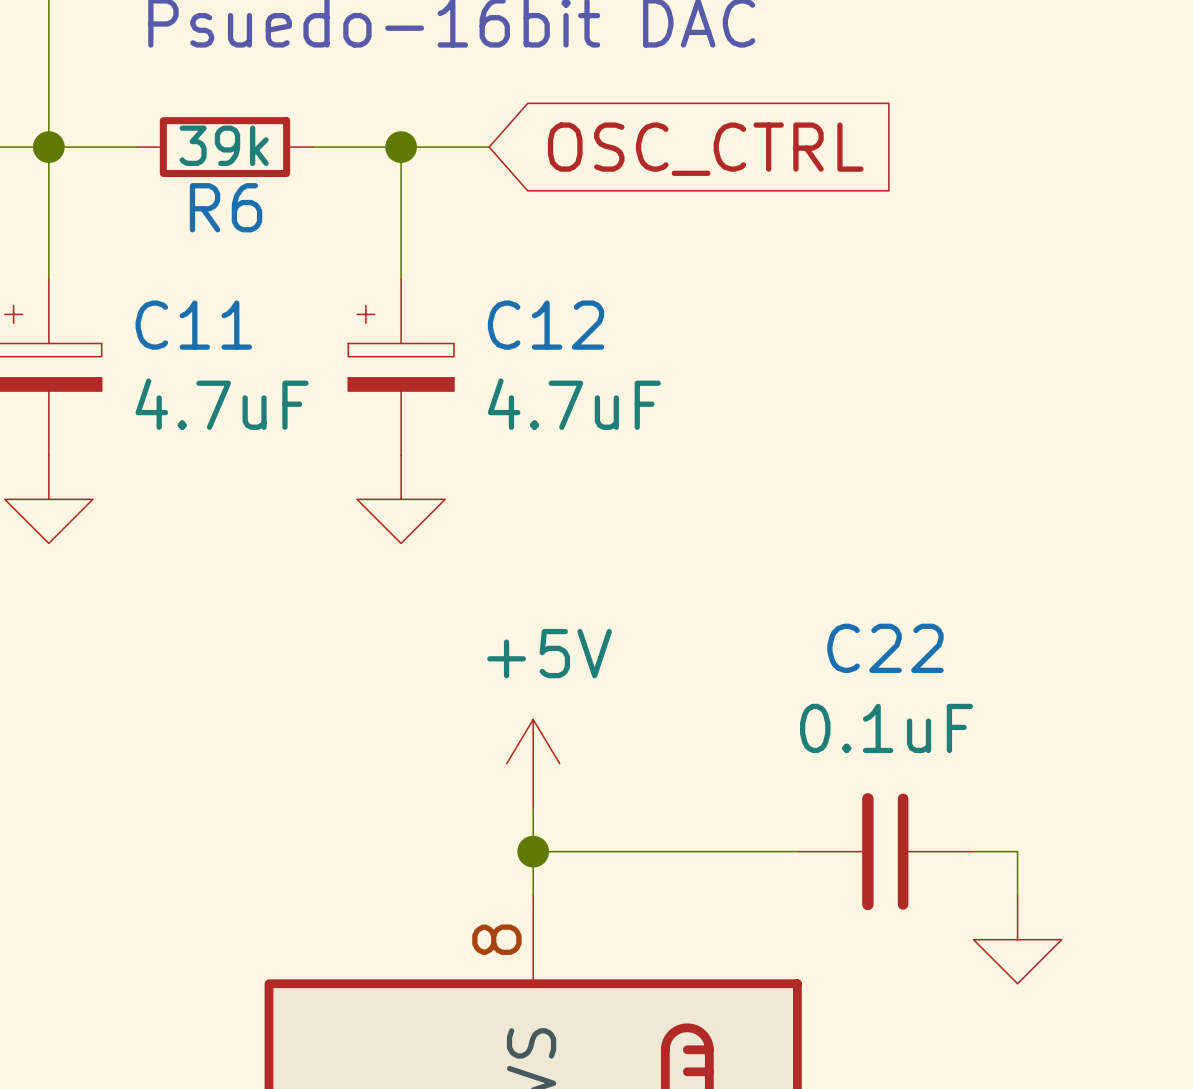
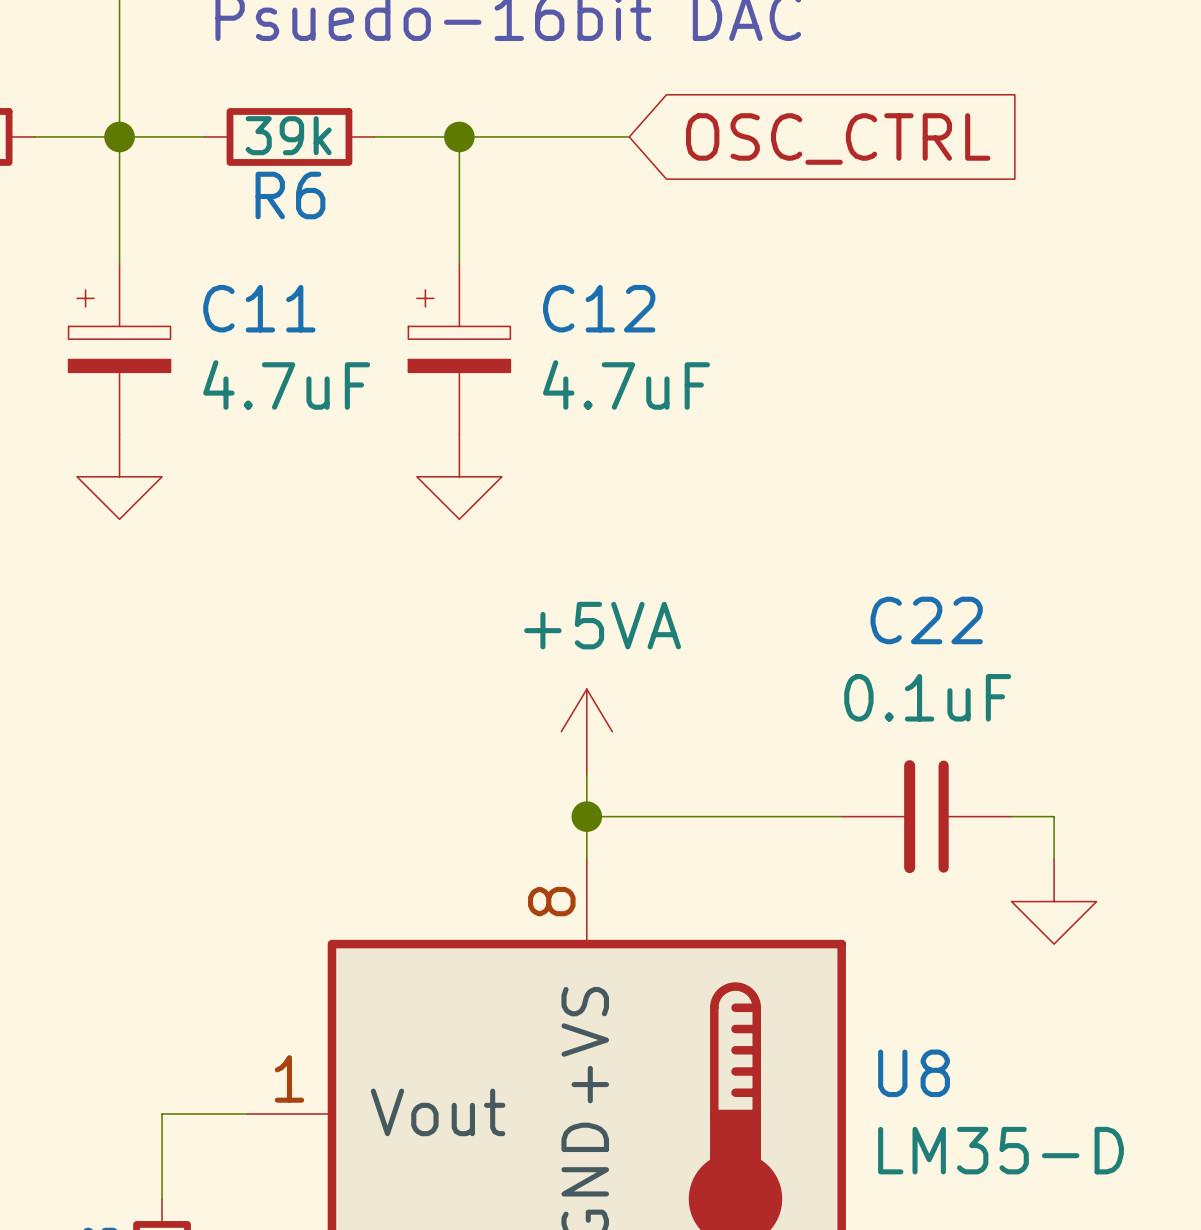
wire: none -> (544, 136) (629, 136)
global label position: OSC_CTRL (705, 149) -> OSC_CTRL (838, 138)
power symbol: +5V (533, 763) -> +5VA (586, 731)

